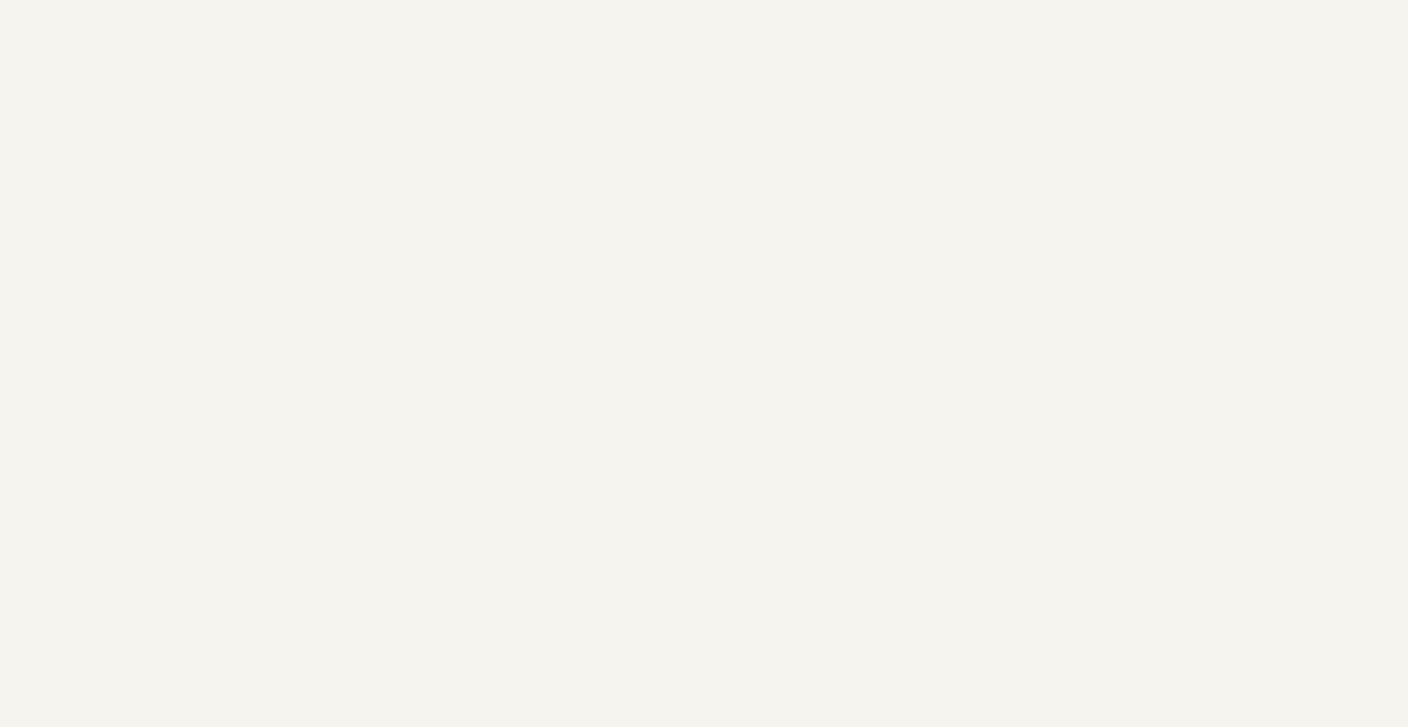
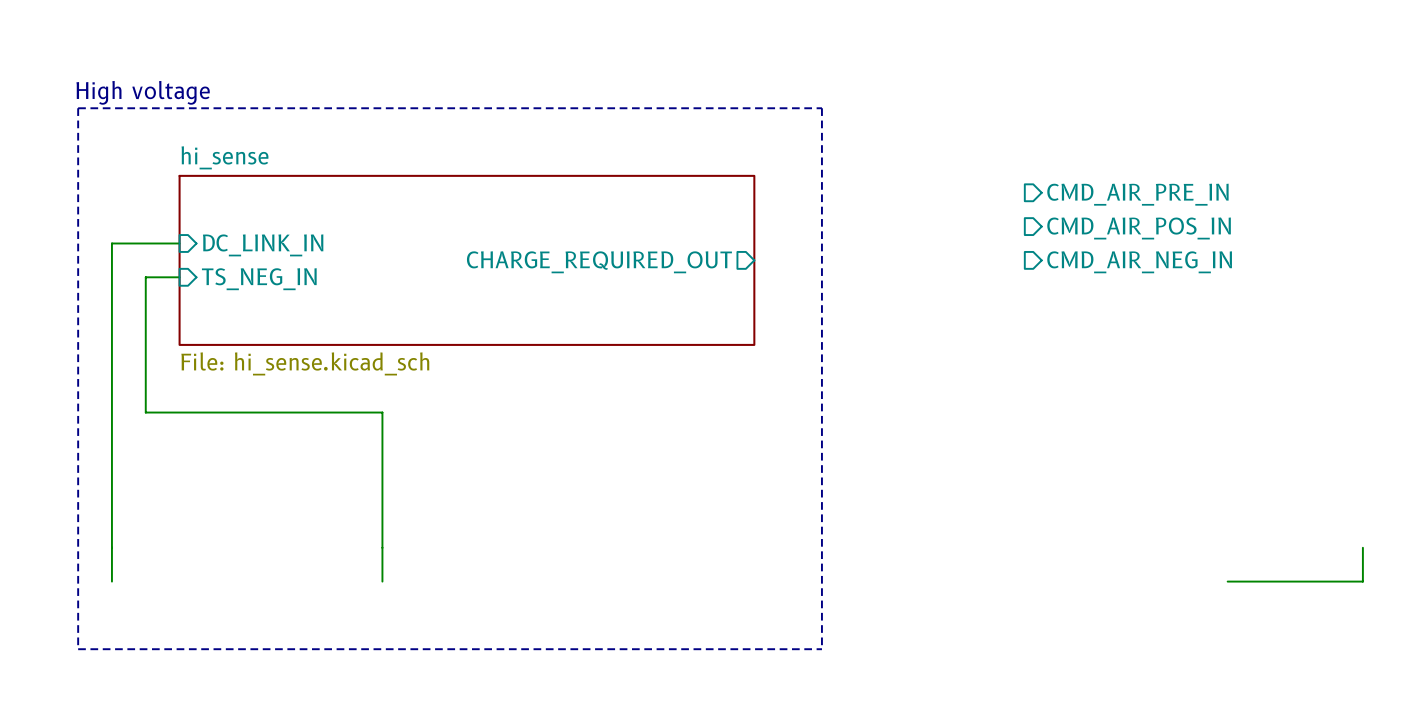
text: none -> High voltage (143, 92)
line: none -> (78, 108) (821, 108) (821, 649) (78, 649) (78, 108)
sheet pin: none -> CMD_AIR_PRE_IN (1137, 194)
sheet pin: none -> CMD_AIR_POS_IN (1139, 228)
wire: none -> (179, 243) (111, 243) (111, 581)
sheet pin: none -> DC_LINK_IN (263, 245)
sheet hi_sense: none -> File: hi_sense.kicad_sch (466, 260)
sheet pin: none -> CHARGE_REQUIRED_OUT (599, 262)
sheet pin: none -> CMD_AIR_NEG_IN (1139, 262)
wire: none -> (179, 277) (145, 277) (145, 412) (382, 412) (382, 581)
sheet pin: none -> TS_NEG_IN (259, 279)
wire: none -> (1362, 547) (1362, 581) (1227, 581)

